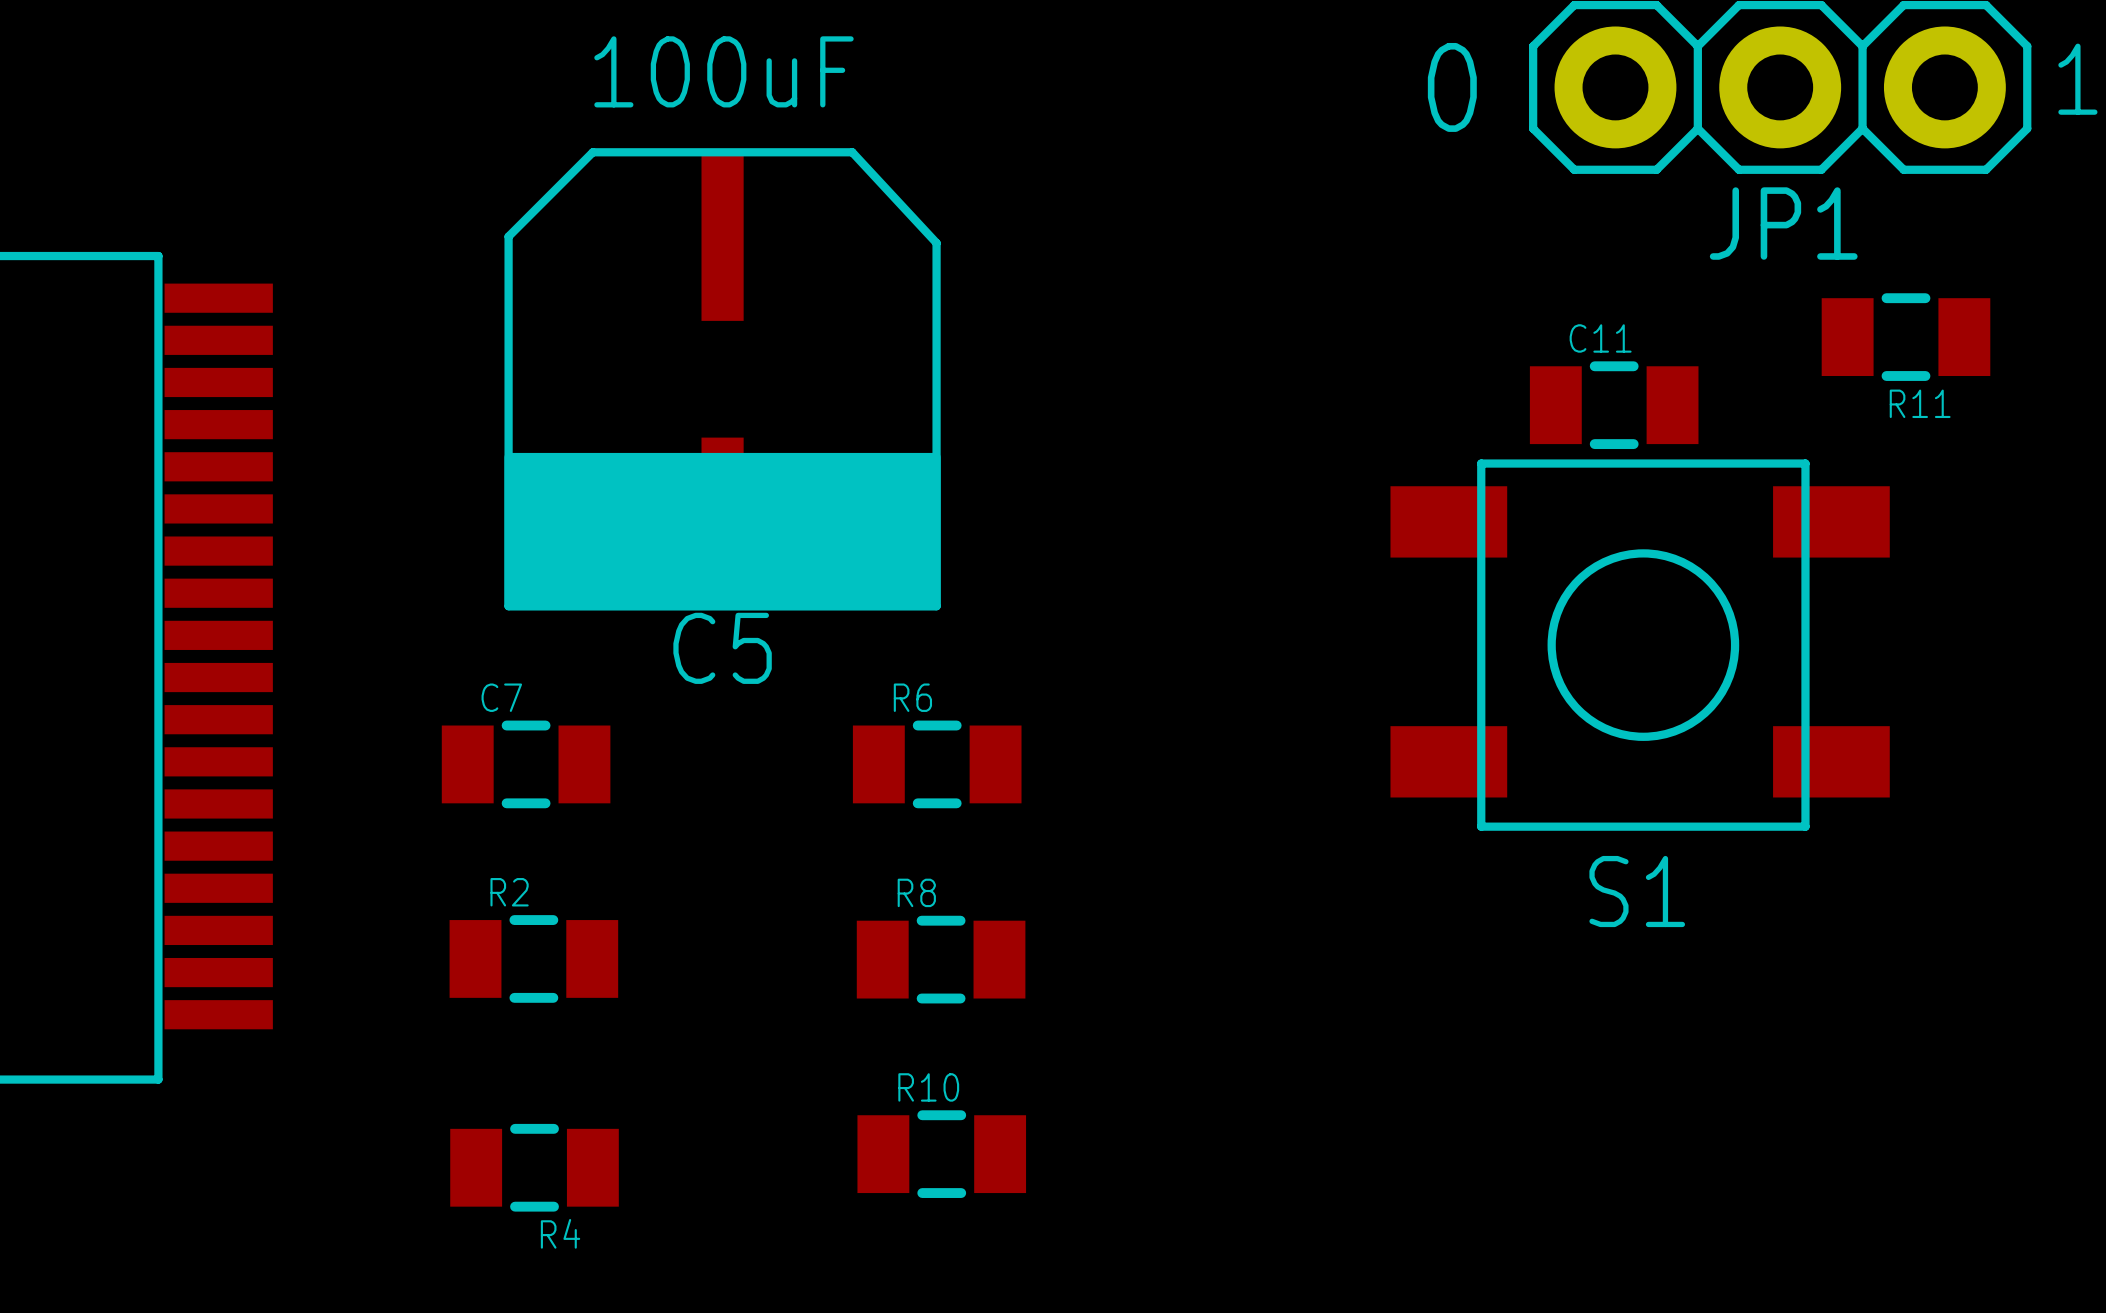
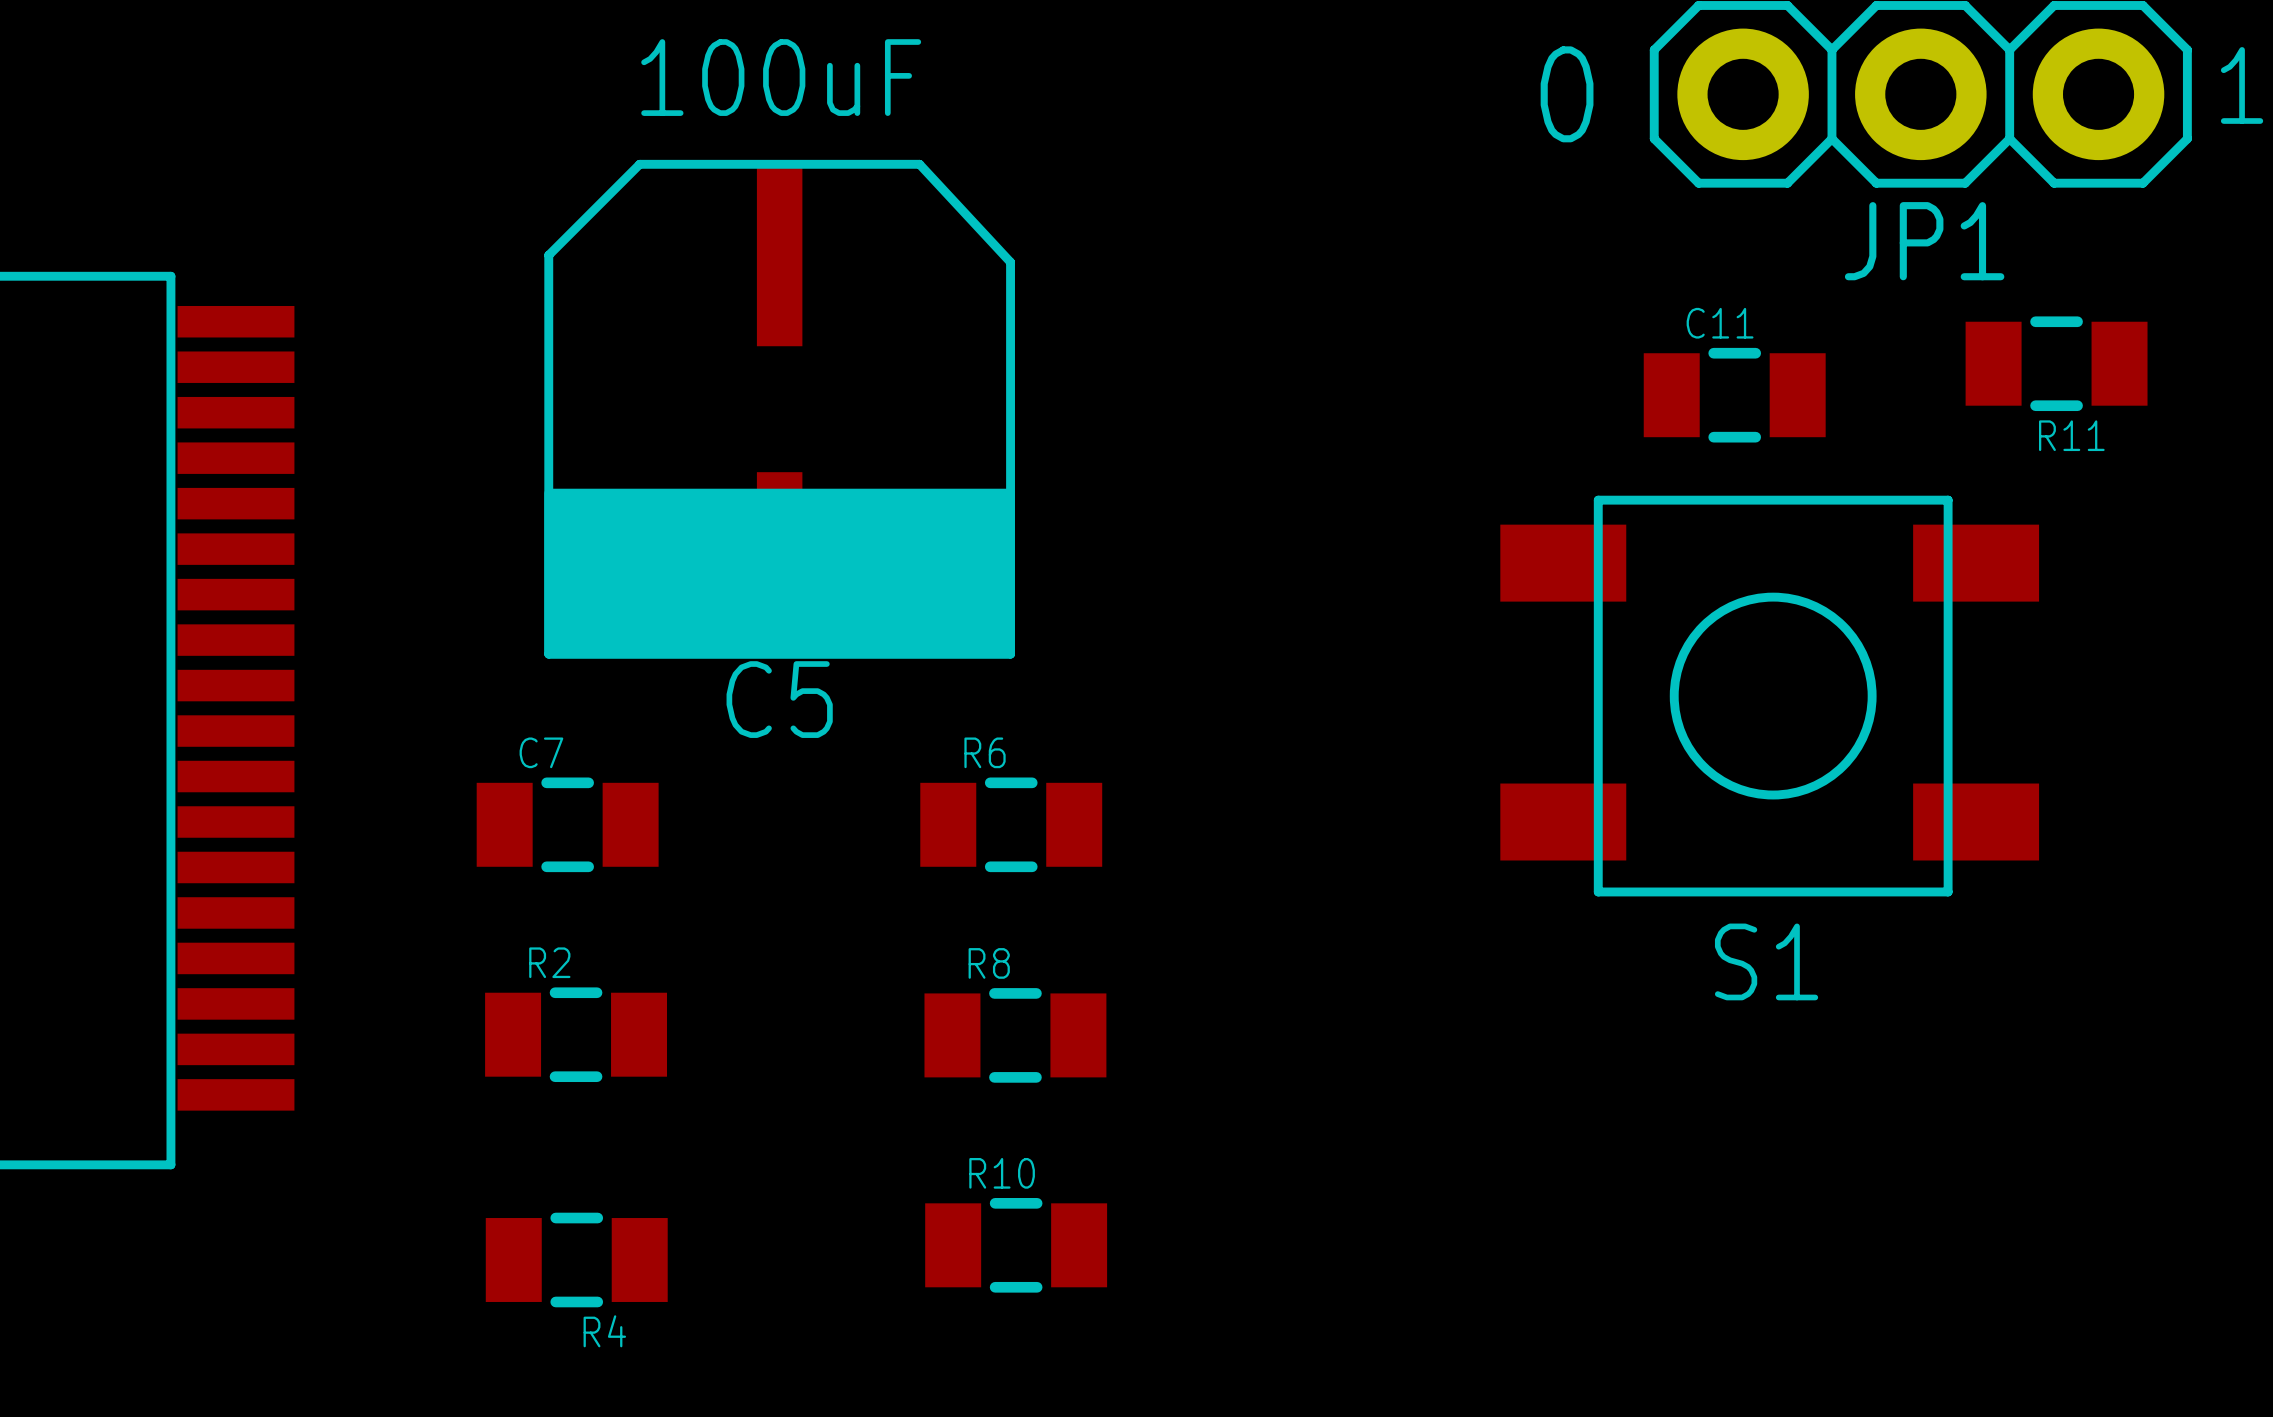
C11 position: (1614, 405) -> (1734, 395)

